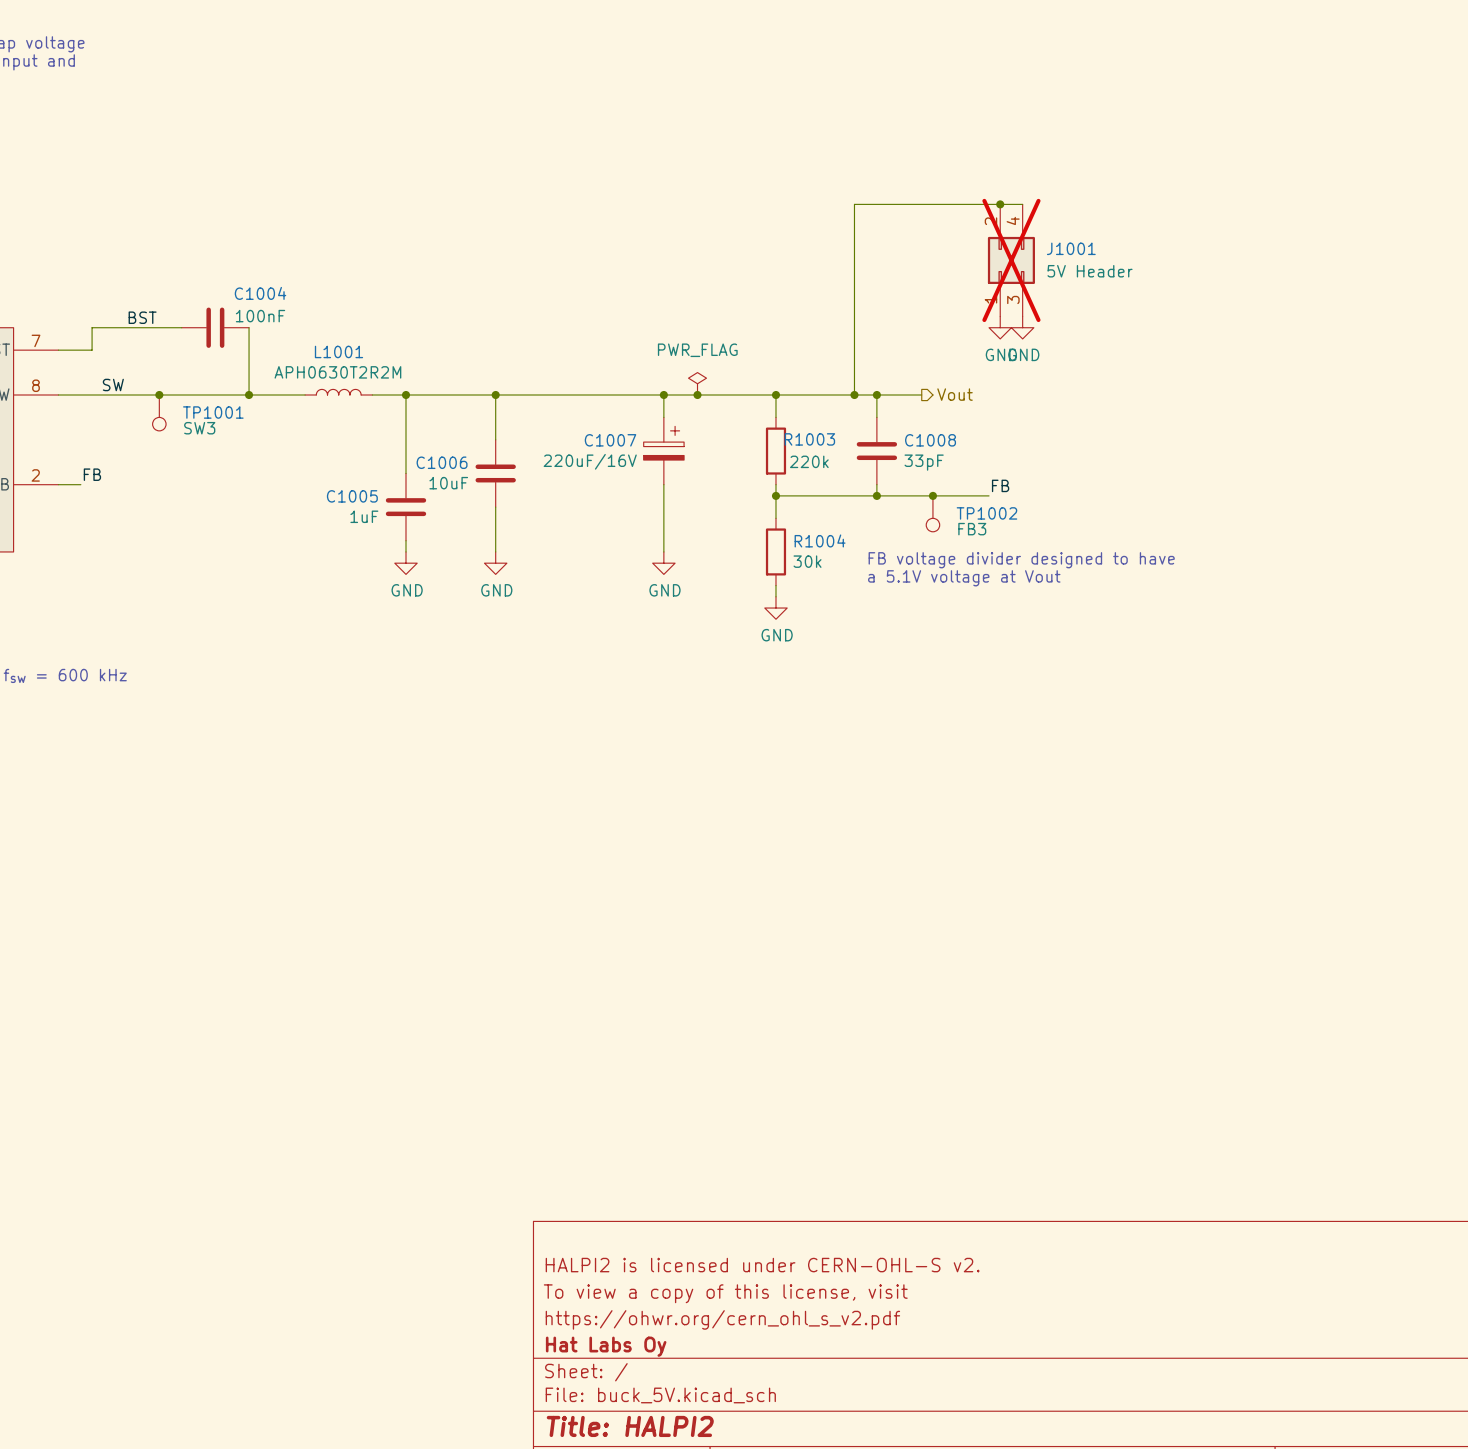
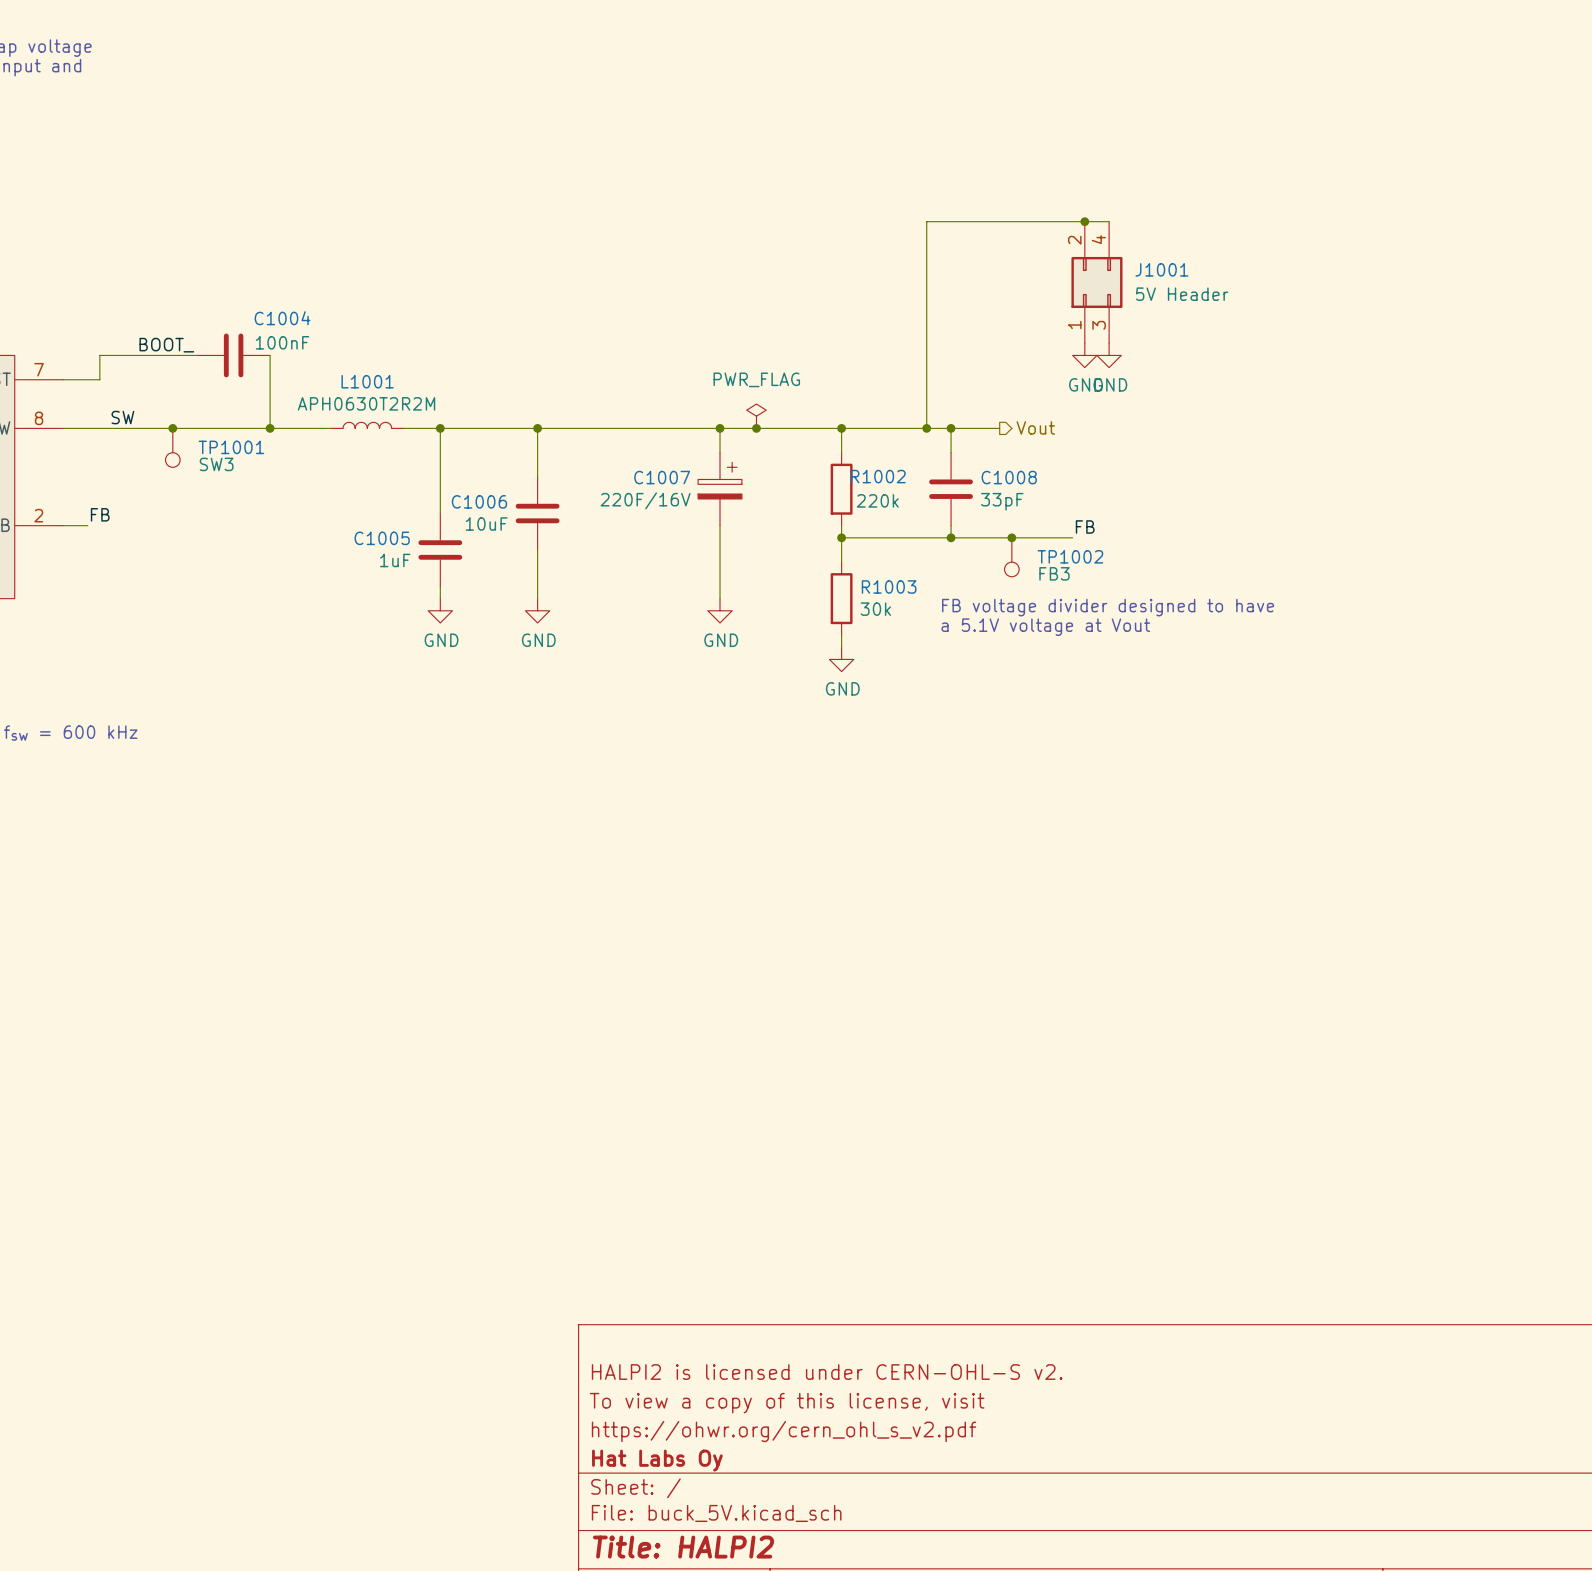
J1001 do-not-place cross: (1011, 260) -> none
label: BST (142, 317) -> BOOT_ (166, 345)
R1003 name: R1003 (809, 439) -> R1002 (878, 476)
C1007 value: 220uF/16V (590, 461) -> 220F/16V (645, 500)
R1004 name: R1004 (820, 540) -> R1003 (889, 586)

